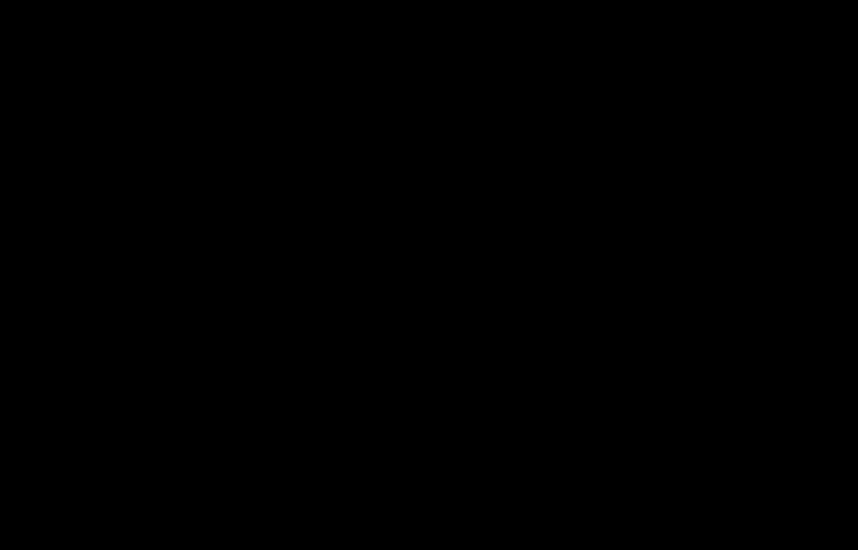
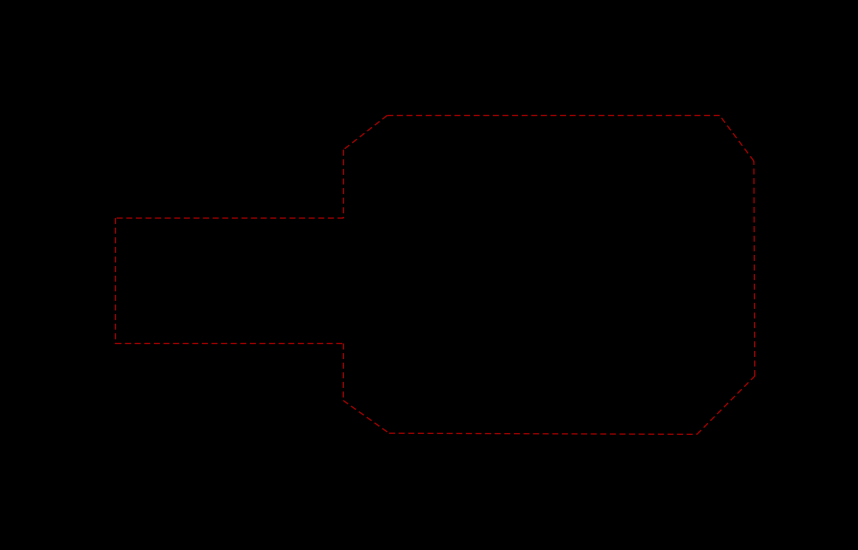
top zone outline: none -> (387, 115) (719, 115) (753, 161) (754, 376) (696, 434) (389, 433) (343, 400) (343, 343) (115, 343) (115, 218) (343, 218) (343, 149) (387, 115)

